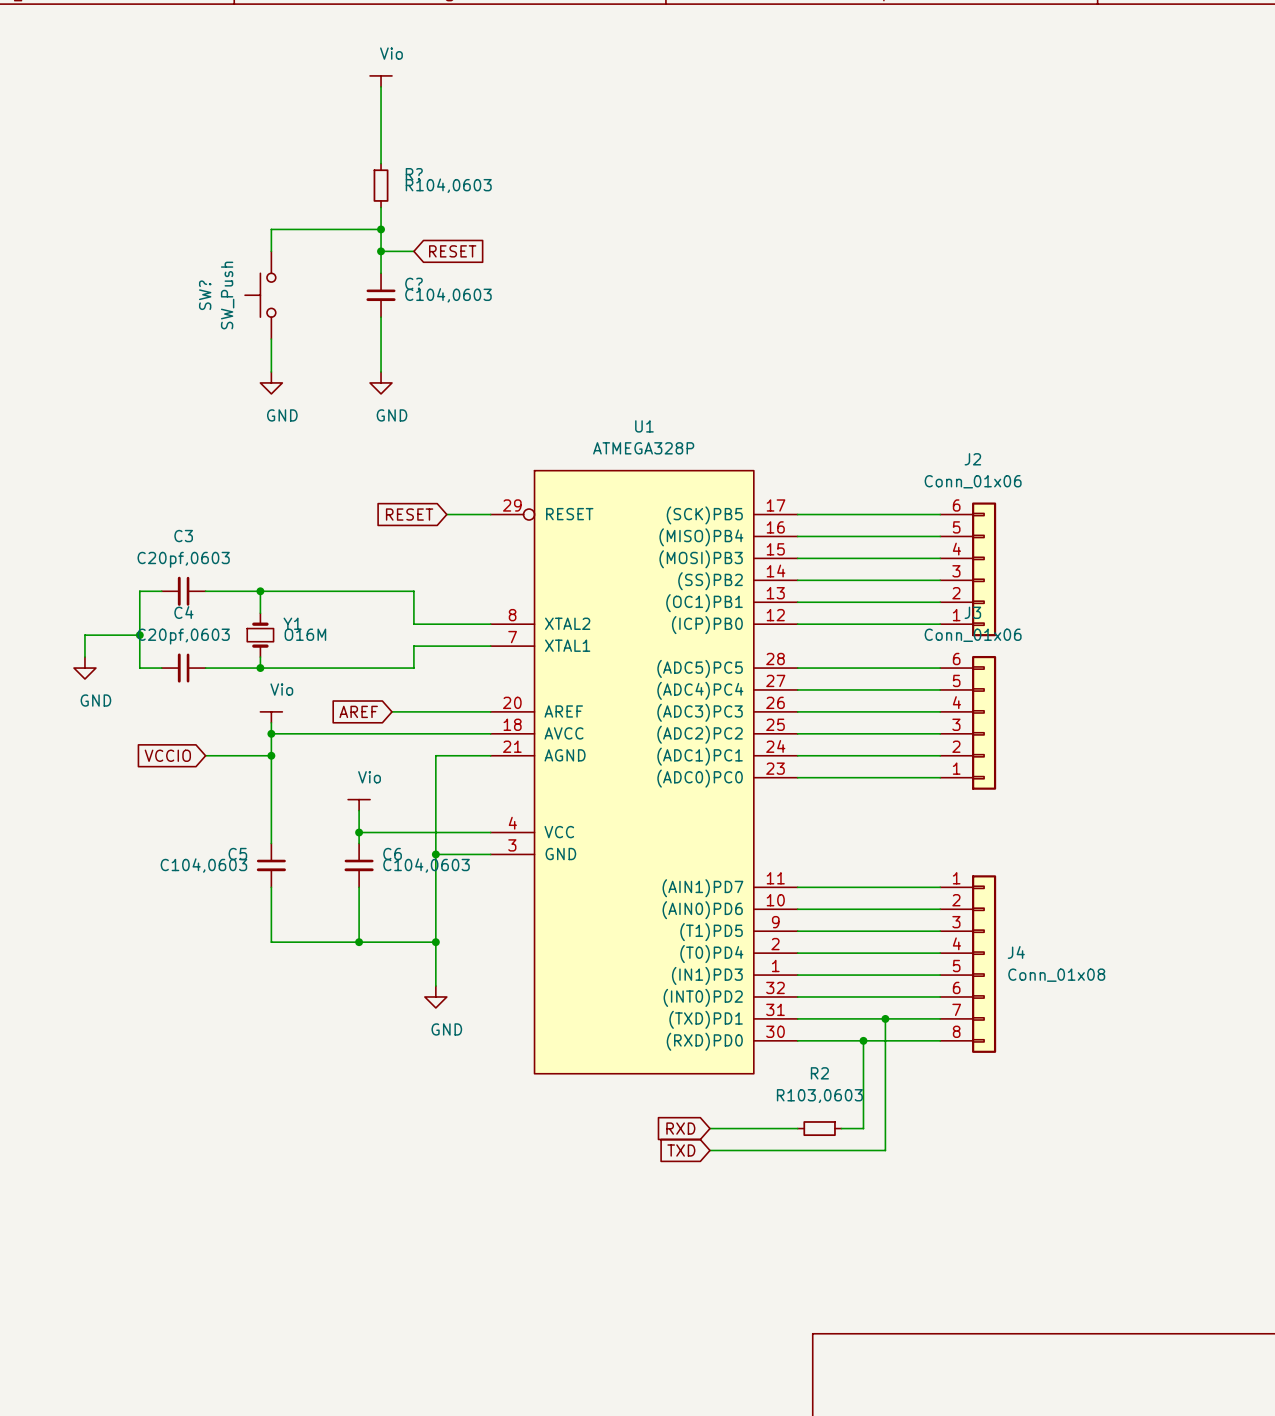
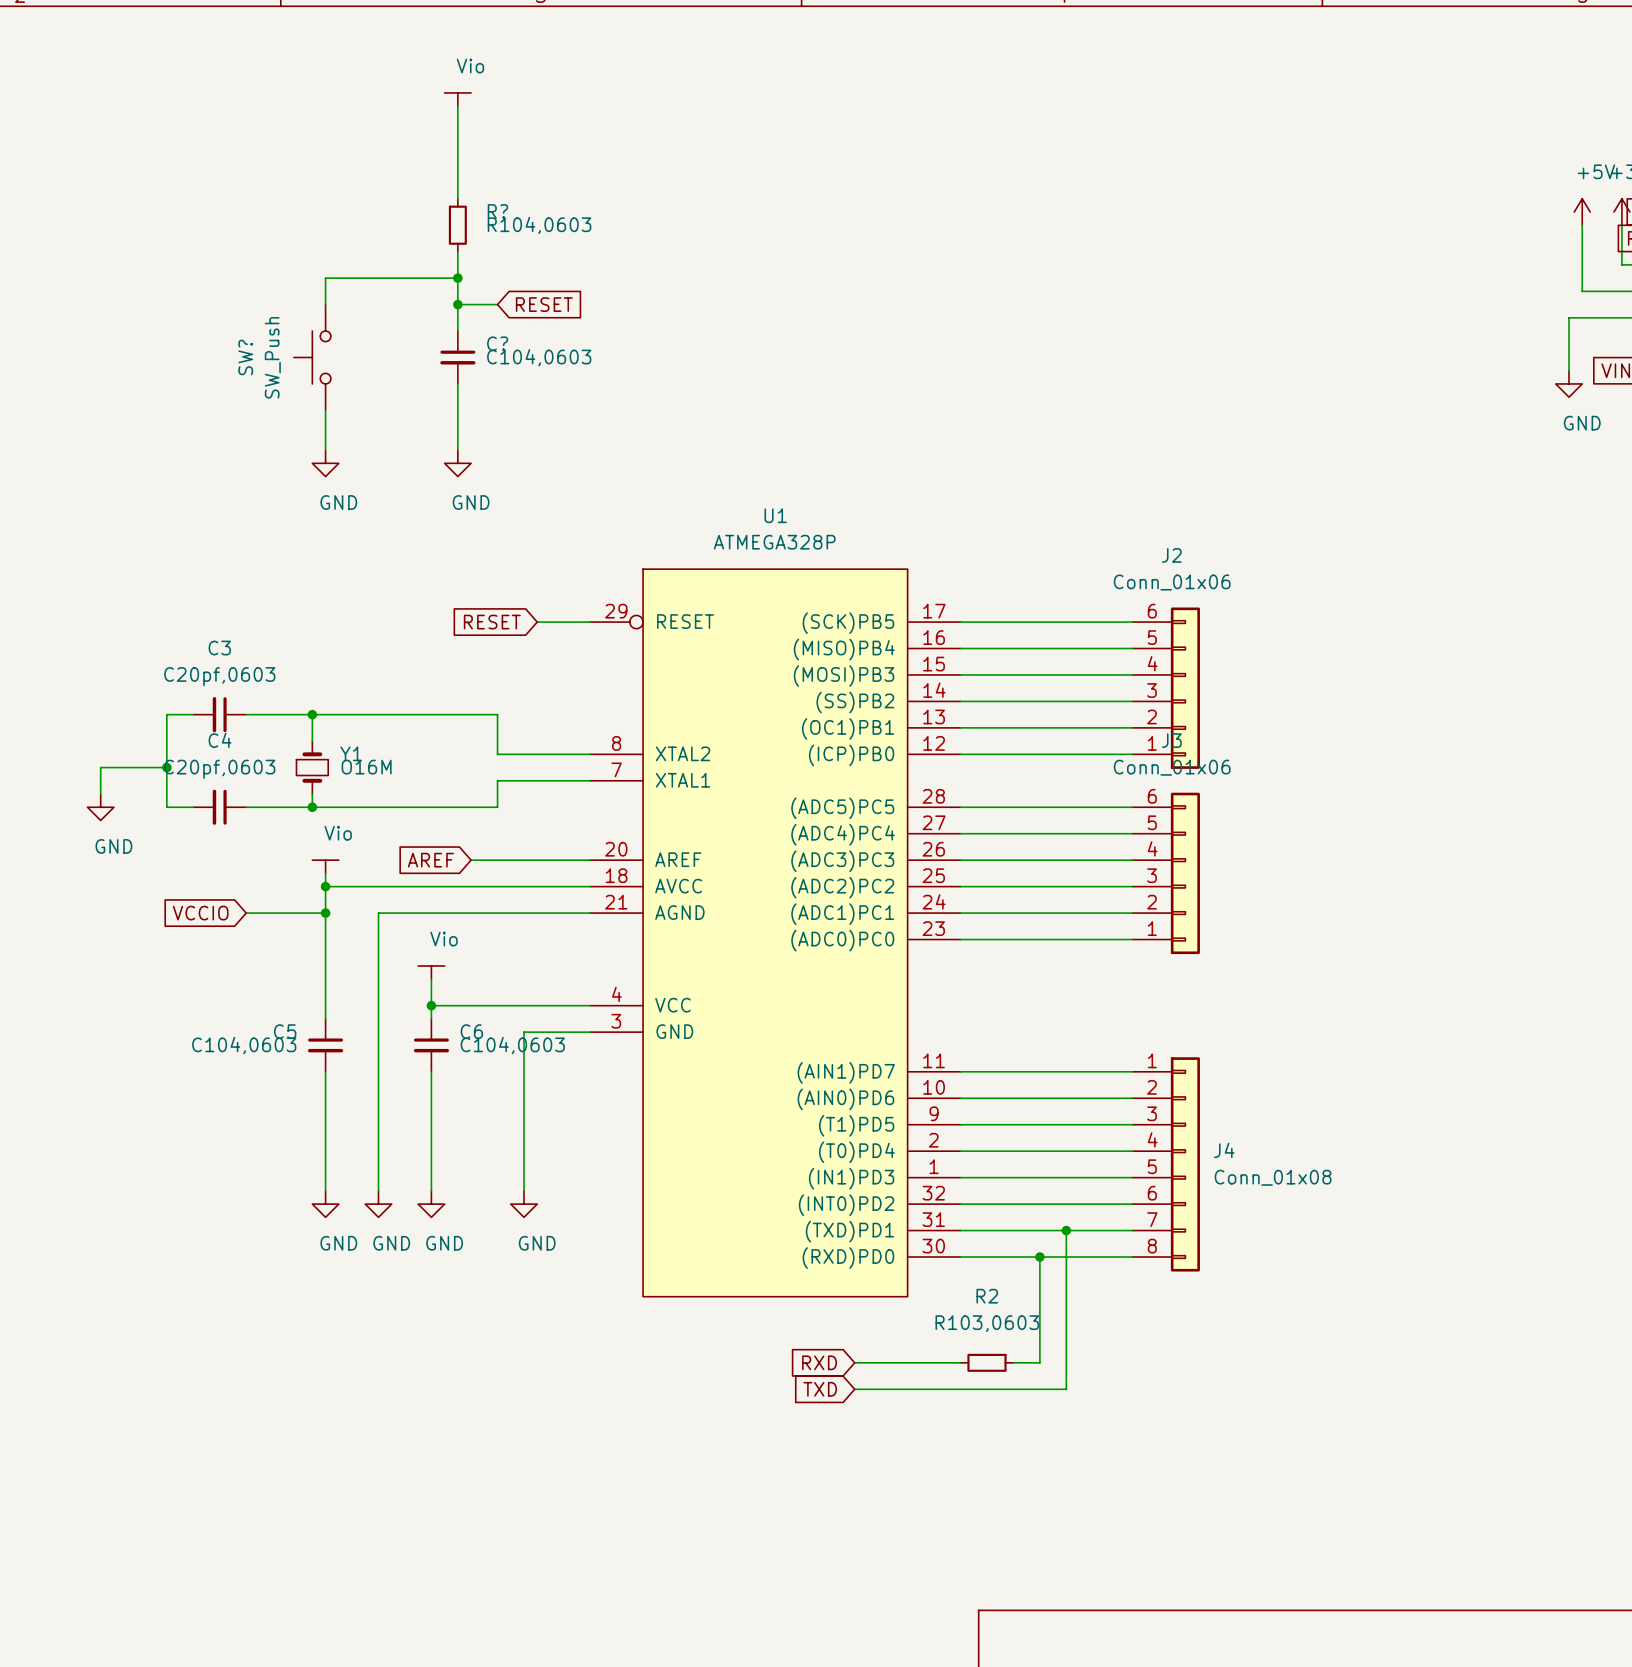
wire: (435, 755) (435, 854) -> (524, 913) (378, 913) (378, 1190)
junction: (435, 854) -> none
wire: (271, 942) (435, 942) -> (325, 1137) (325, 1190)
wire: none -> (431, 1137) (431, 1190)
junction: (359, 942) -> none
junction: (435, 942) -> none
power symbol: none -> GND (325, 1204)
power symbol: none -> GND (378, 1204)
power symbol: none -> GND (431, 1204)

